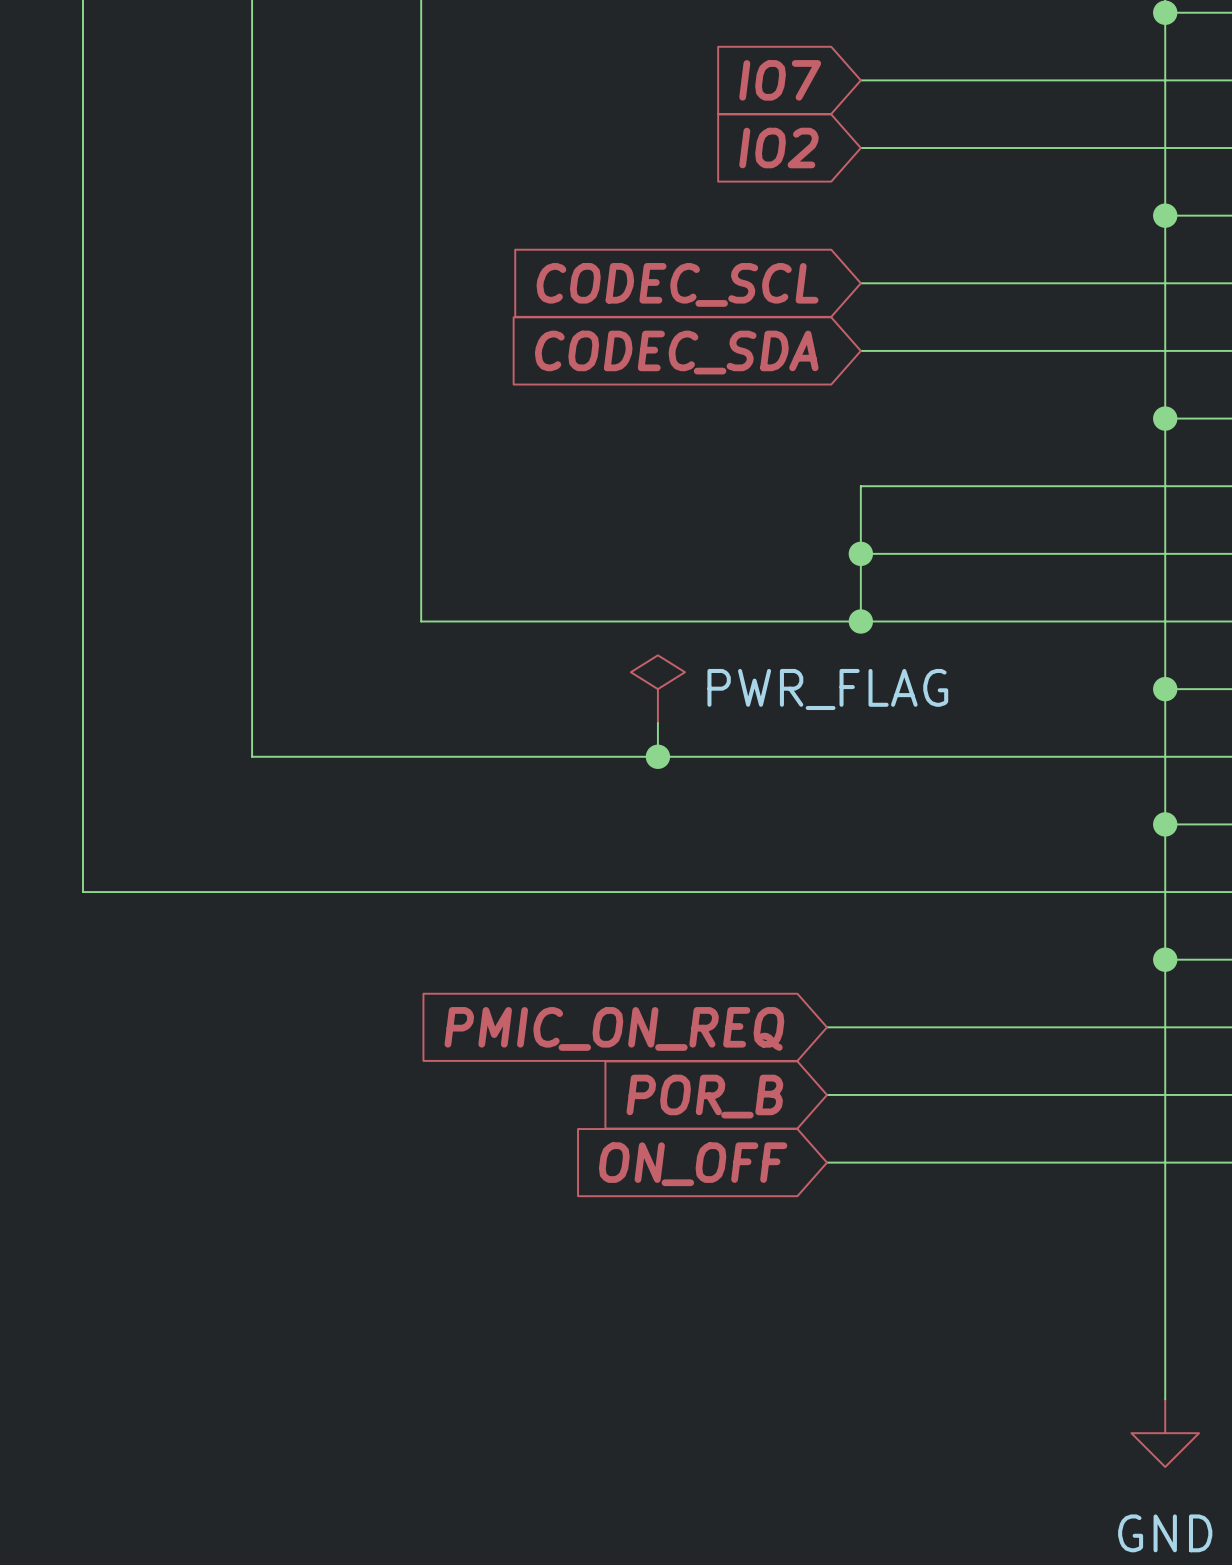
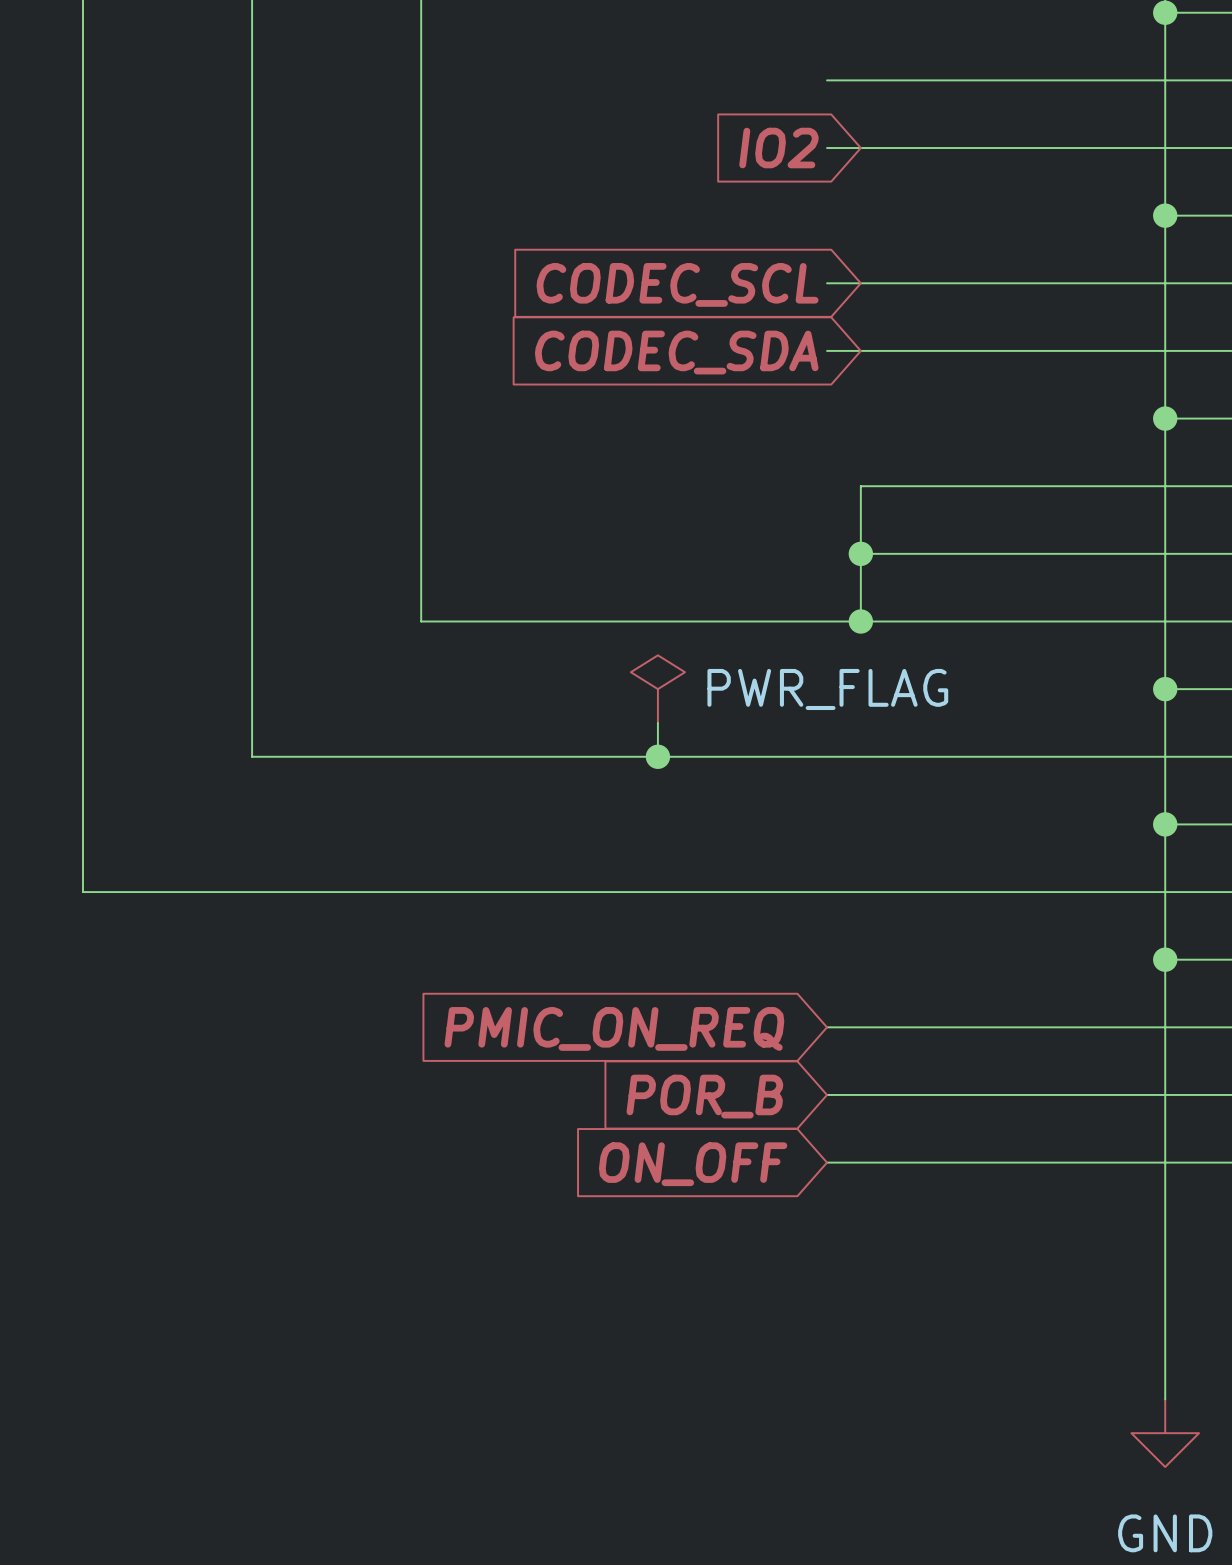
global label: IO7 (780, 80) -> none
wire: none -> (827, 80) (860, 80)
wire: none -> (827, 148) (860, 148)
wire: none -> (827, 283) (860, 283)
wire: none -> (827, 350) (860, 350)

